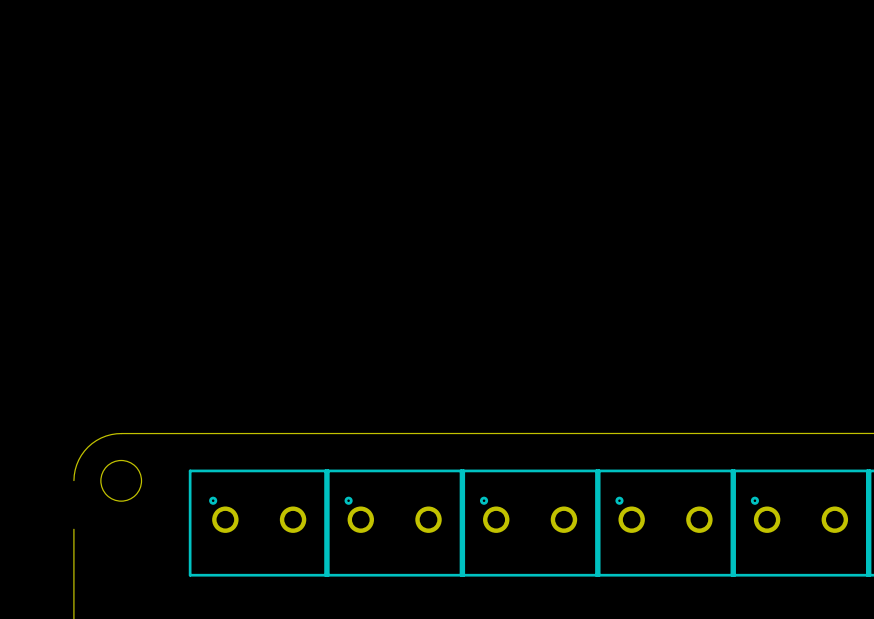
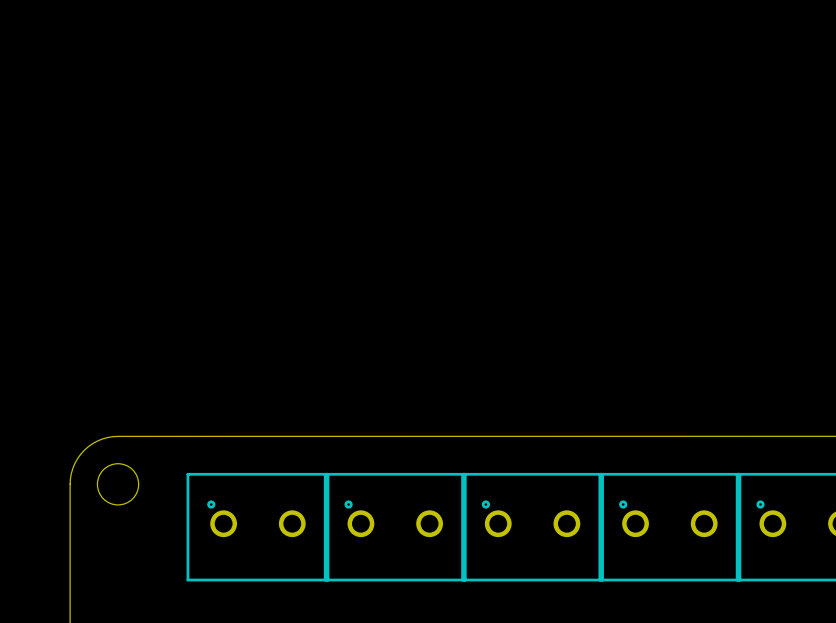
board edge: none -> (70, 484) (70, 533)

